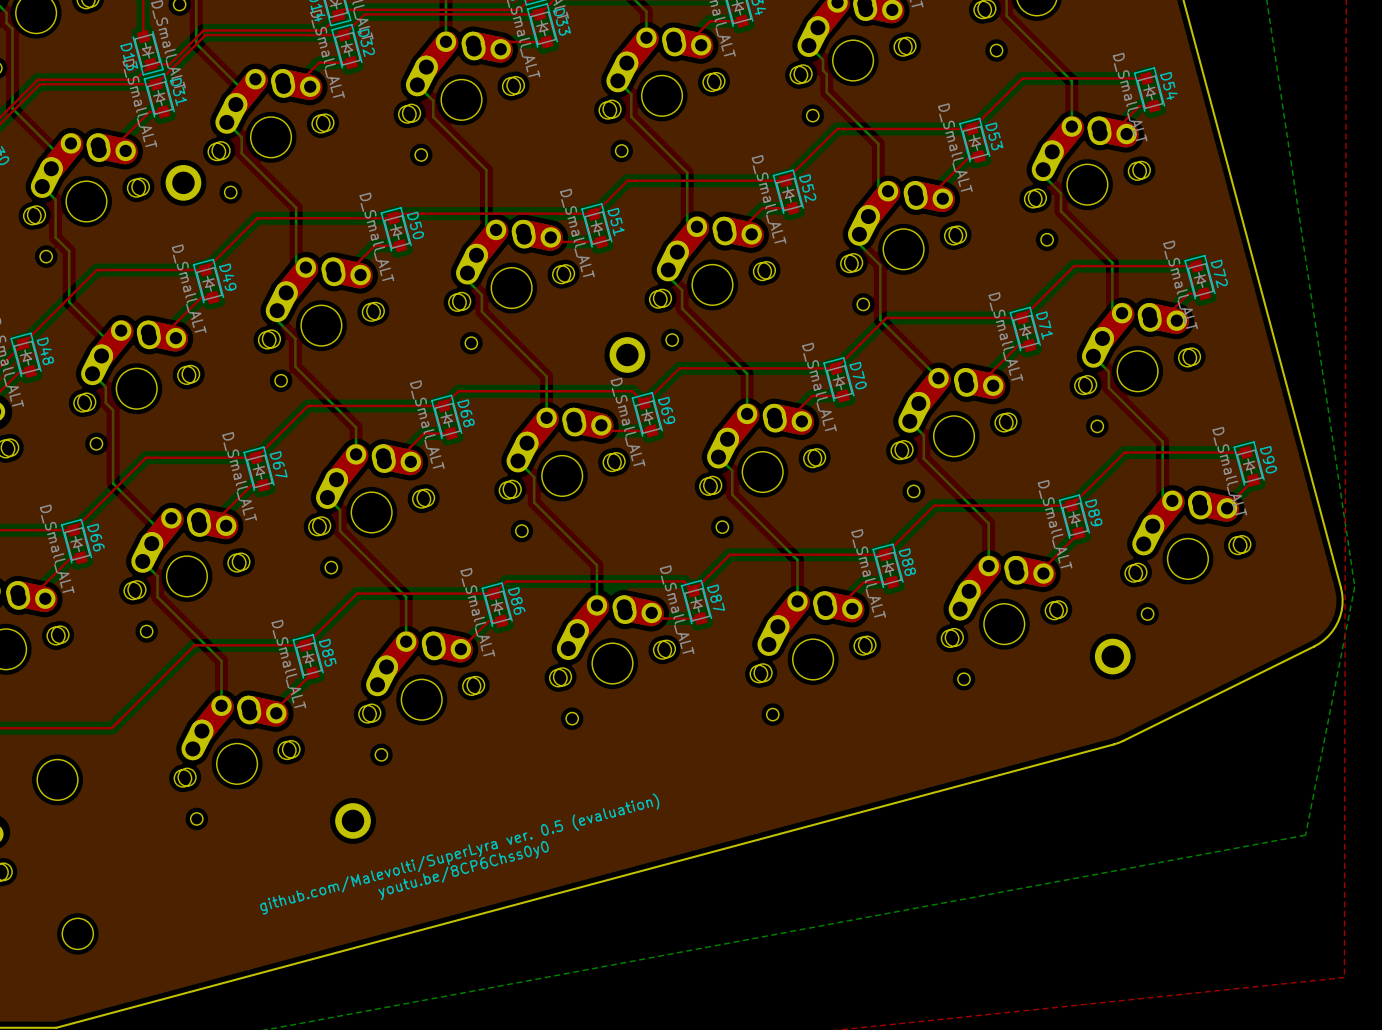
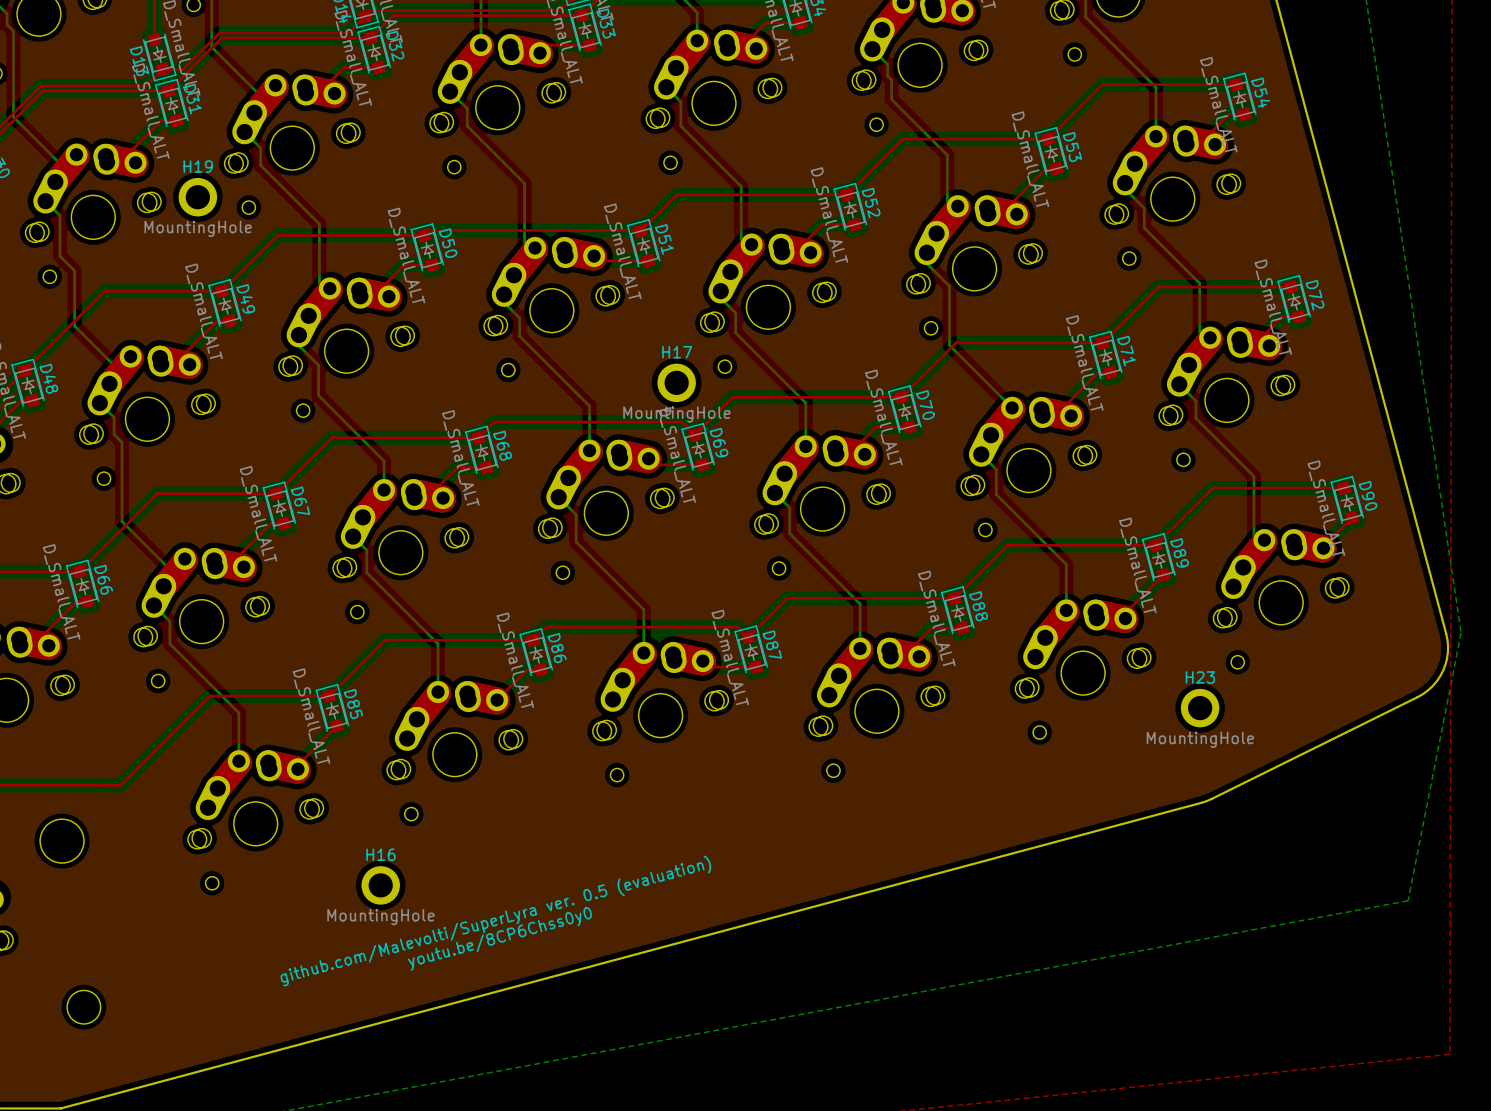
H19 name: none -> H19 (198, 166)
H19 value: none -> MountingHole (198, 228)
H17 name: none -> H17 (677, 352)
H17 value: none -> MountingHole (676, 414)
H23 name: none -> H23 (1200, 677)
H23 value: none -> MountingHole (1200, 739)
H16 name: none -> H16 (380, 854)
H16 value: none -> MountingHole (380, 917)

